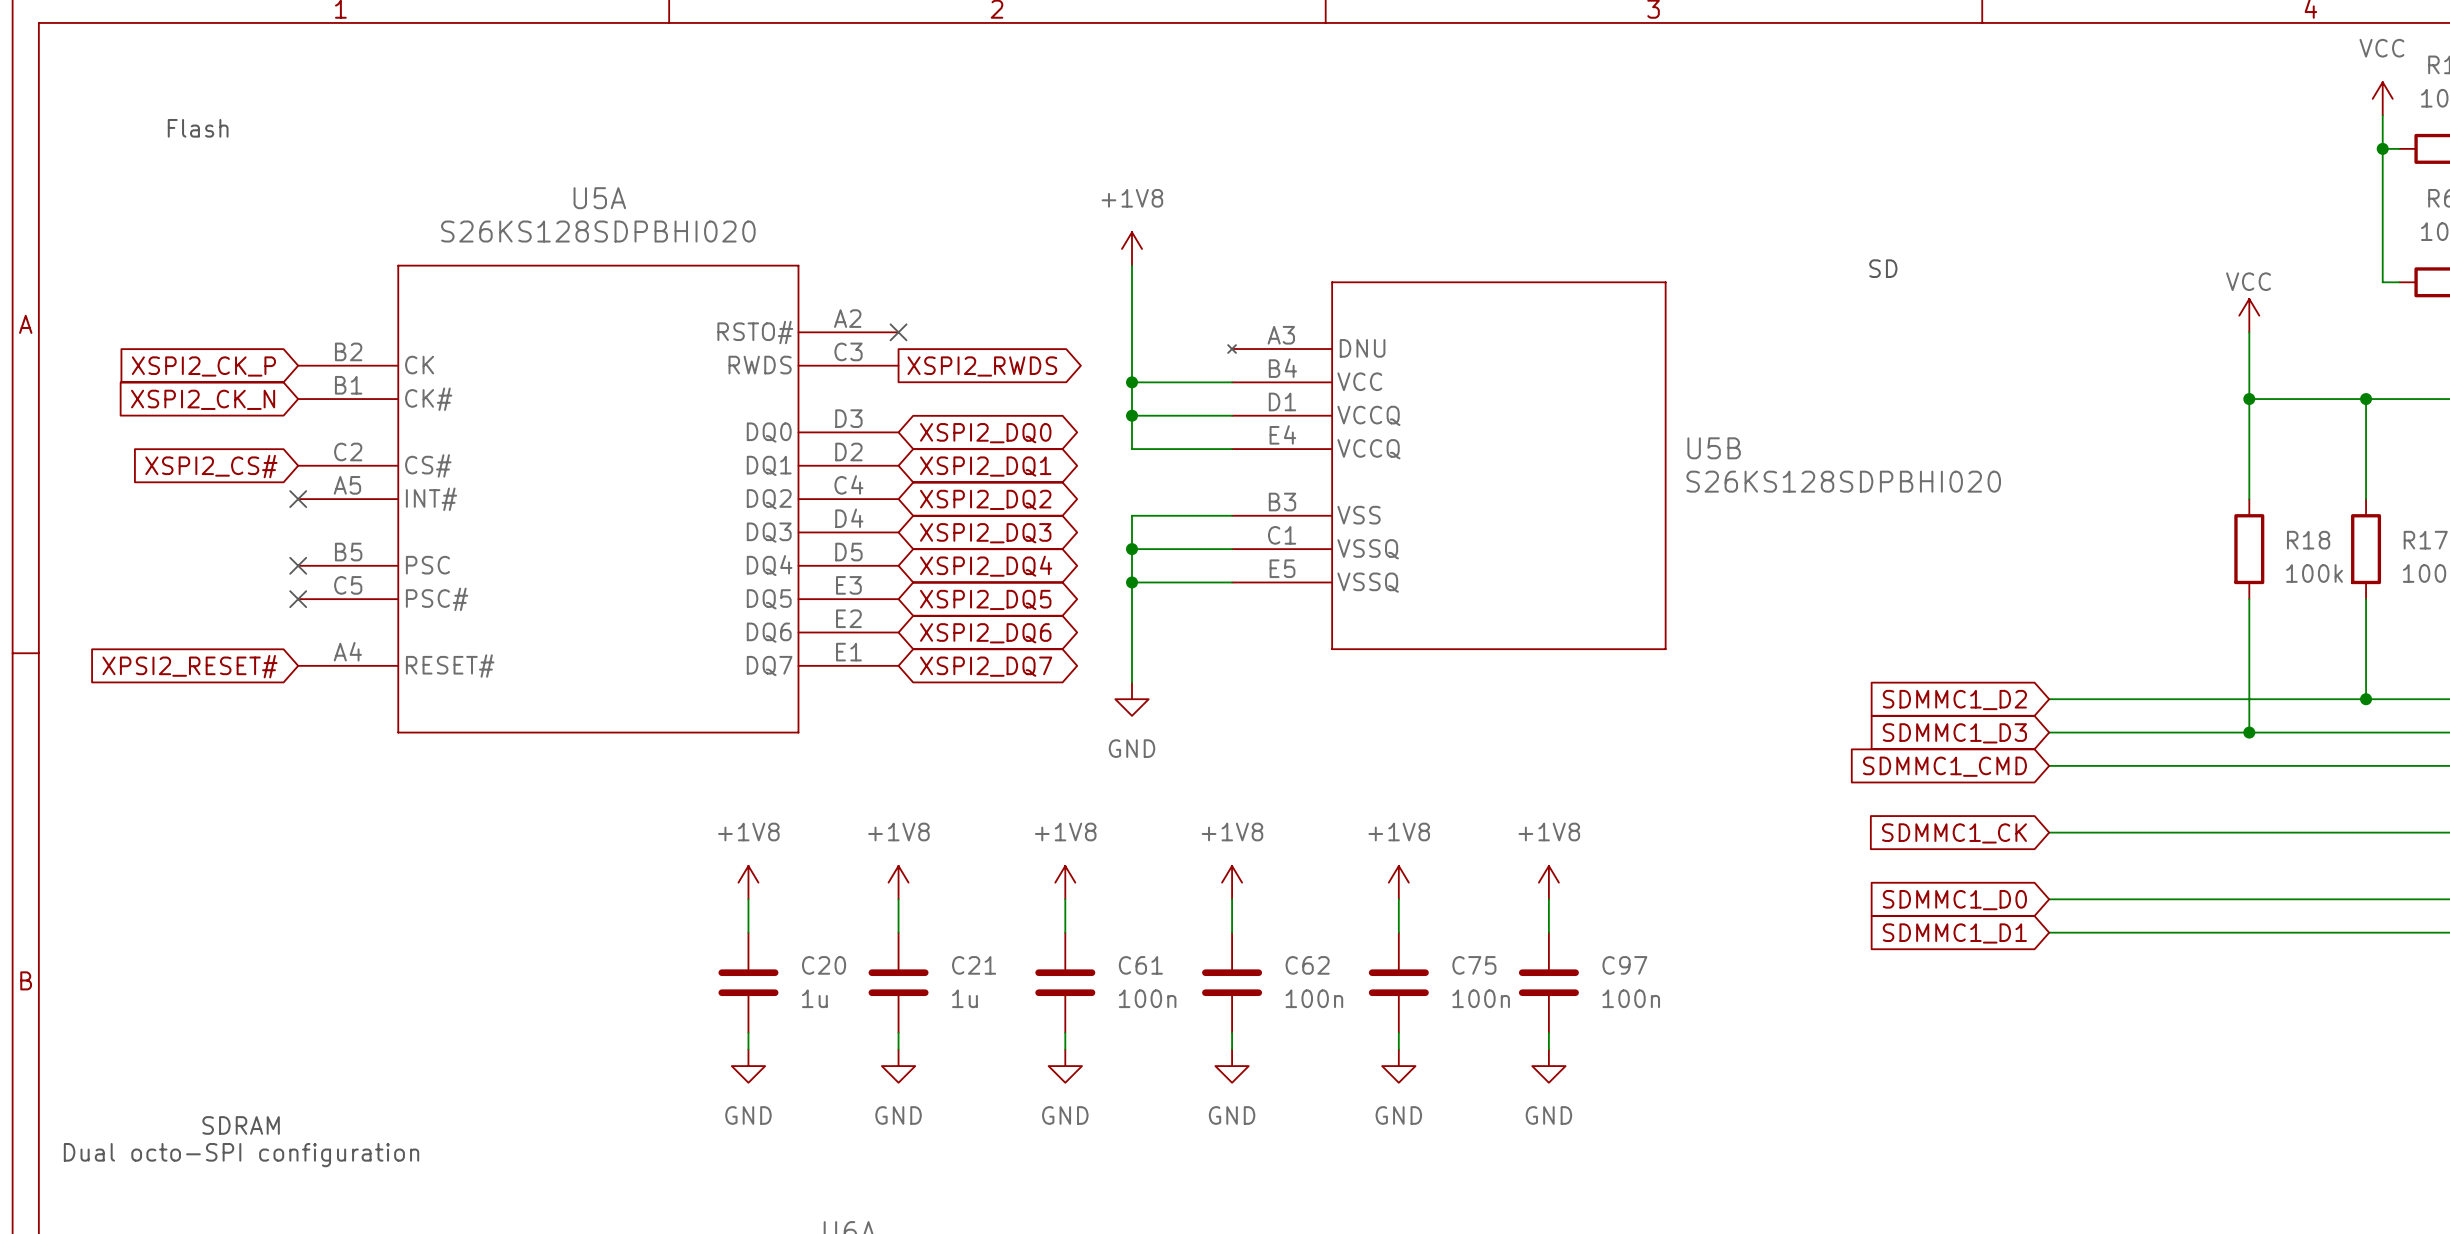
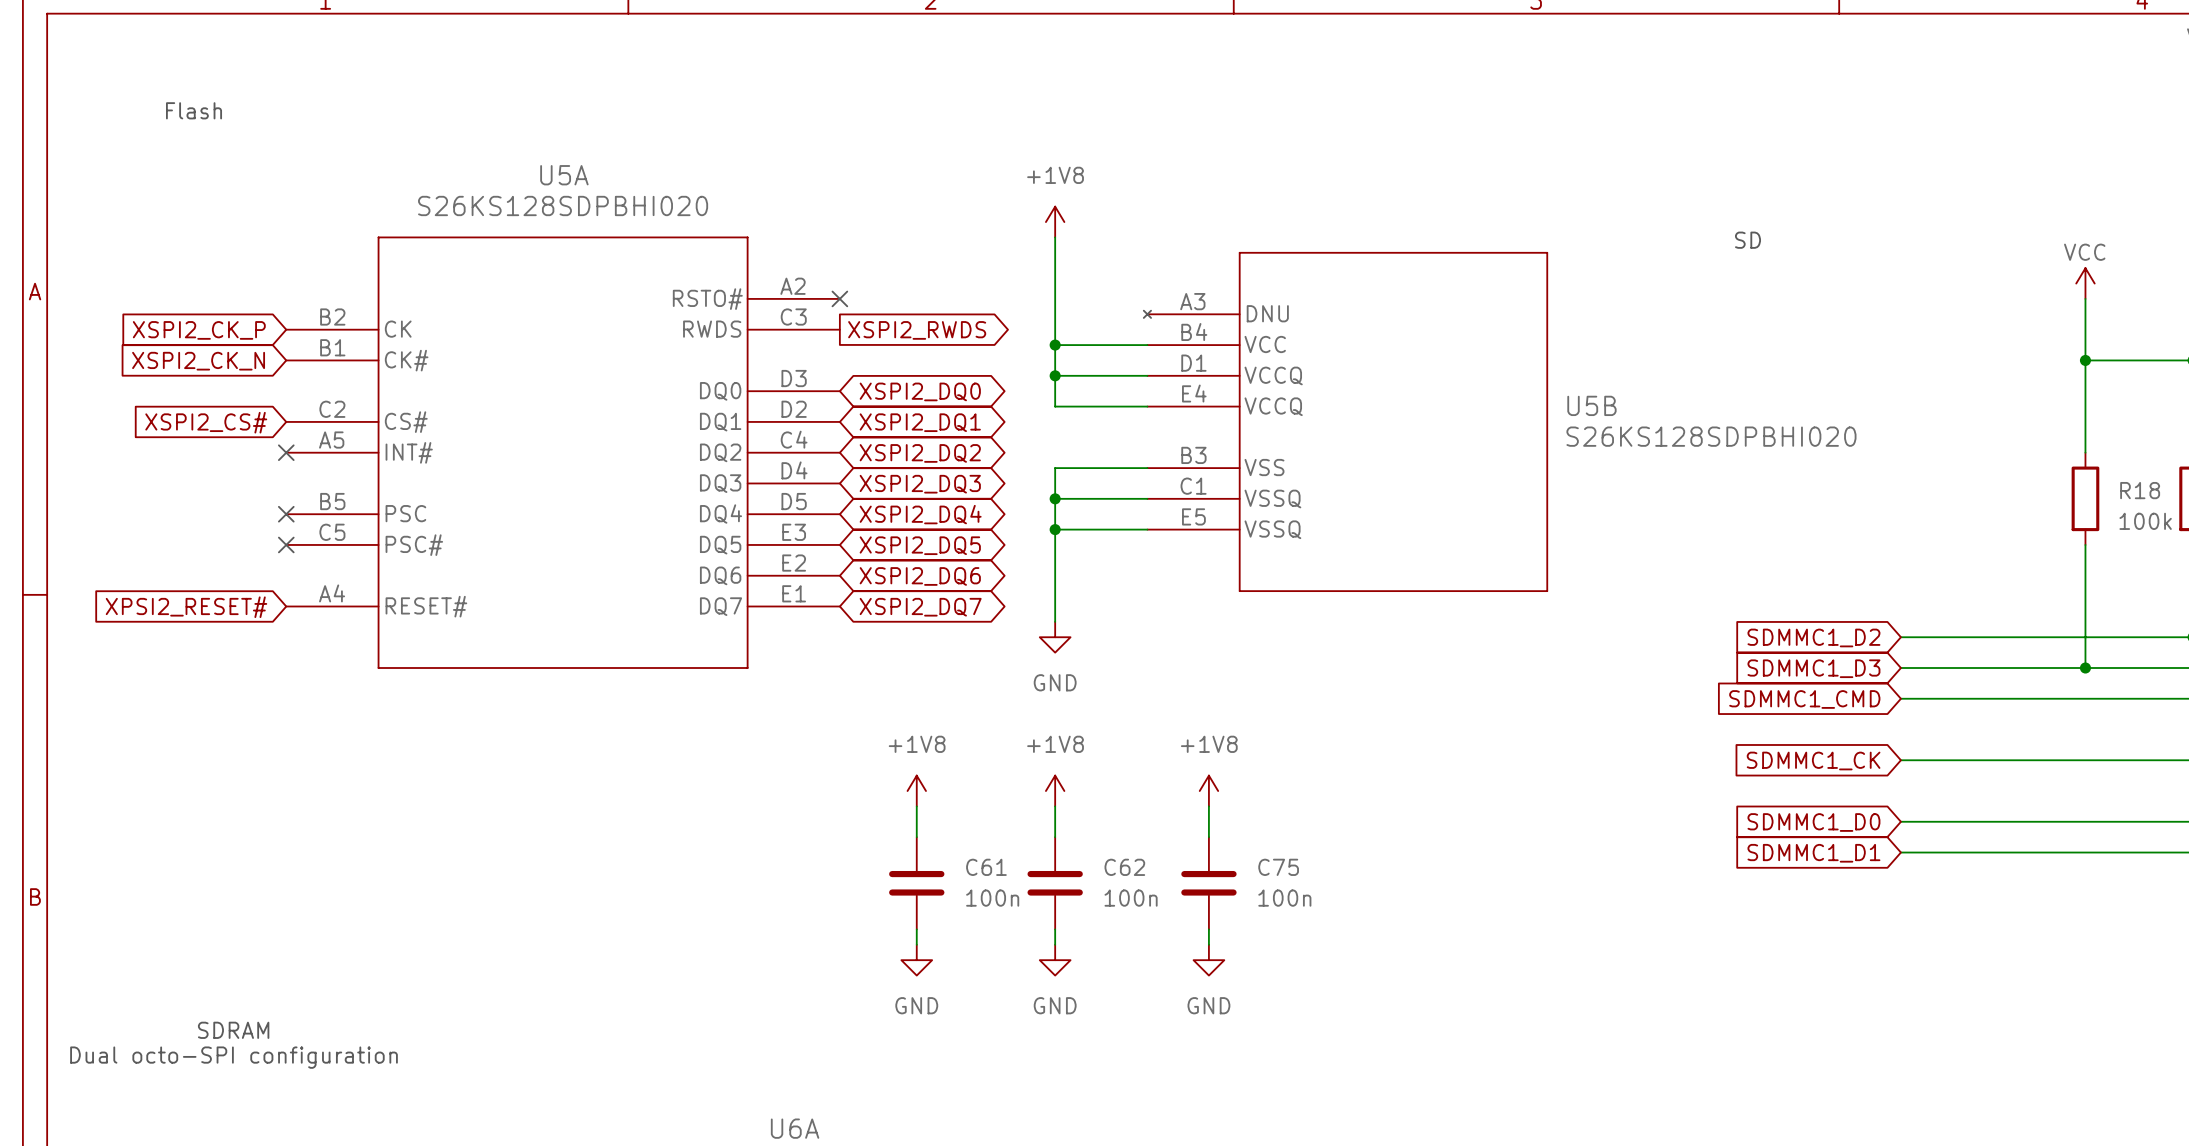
power symbol: none -> +1V8 (916, 791)
power symbol: none -> +1V8 (1055, 791)
power symbol: none -> +1V8 (1208, 791)
power symbol: +1V8 (748, 882) -> none
power symbol: +1V8 (898, 882) -> none
power symbol: +1V8 (1065, 882) -> none
power symbol: +1V8 (1232, 882) -> none
power symbol: +1V8 (1398, 882) -> none
power symbol: +1V8 (1548, 882) -> none
wire: (748, 899) (748, 932) -> (916, 806) (916, 837)
wire: (898, 899) (898, 932) -> (1055, 806) (1055, 837)
wire: (1065, 899) (1065, 932) -> (1208, 806) (1208, 837)
wire: (1232, 899) (1232, 932) -> none
wire: (1398, 899) (1398, 932) -> none
wire: (1548, 899) (1548, 932) -> none
C20: 1u (748, 982) -> none
C21: 1u (898, 982) -> none
C61 position: (1065, 982) -> (916, 883)
C62 position: (1232, 982) -> (1055, 883)
C75 position: (1398, 982) -> (1208, 883)
C97: 100n (1548, 982) -> none
wire: (748, 1032) (748, 1049) -> (916, 929) (916, 944)
wire: (898, 1032) (898, 1049) -> (1055, 929) (1055, 944)
wire: (1065, 1032) (1065, 1049) -> (1208, 929) (1208, 944)
wire: (1232, 1032) (1232, 1049) -> none
wire: (1398, 1032) (1398, 1049) -> none
wire: (1548, 1032) (1548, 1049) -> none
power symbol: none -> GND (916, 960)
power symbol: none -> GND (1055, 960)
power symbol: none -> GND (1208, 960)
power symbol: GND (748, 1066) -> none
power symbol: GND (898, 1066) -> none
power symbol: GND (1065, 1066) -> none
power symbol: GND (1232, 1066) -> none
power symbol: GND (1398, 1066) -> none
power symbol: GND (1548, 1066) -> none

